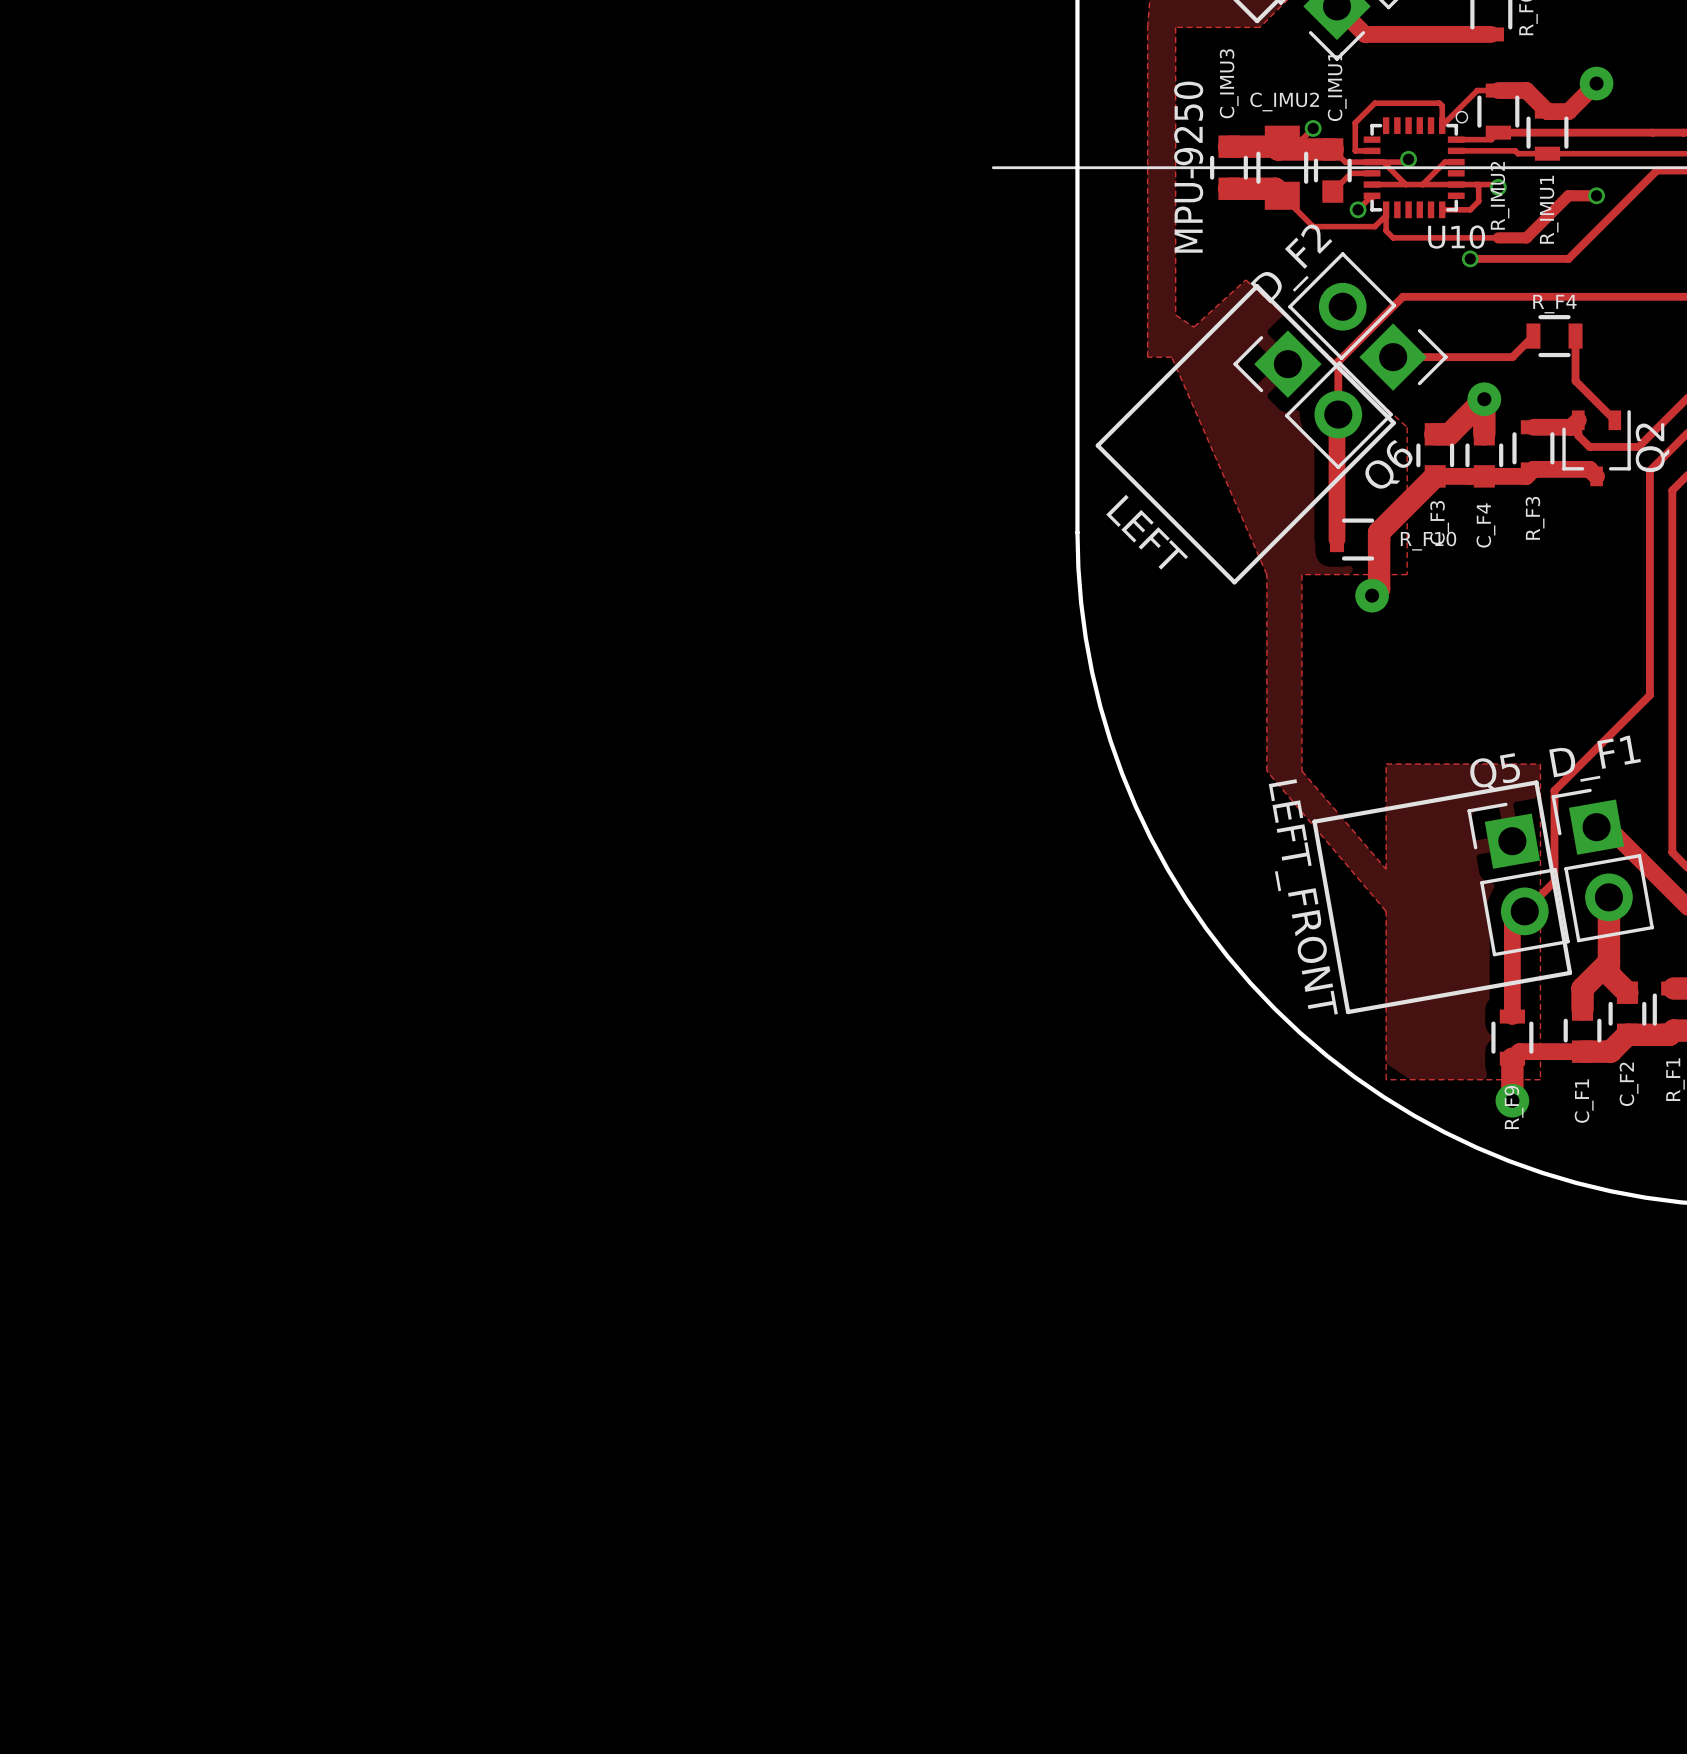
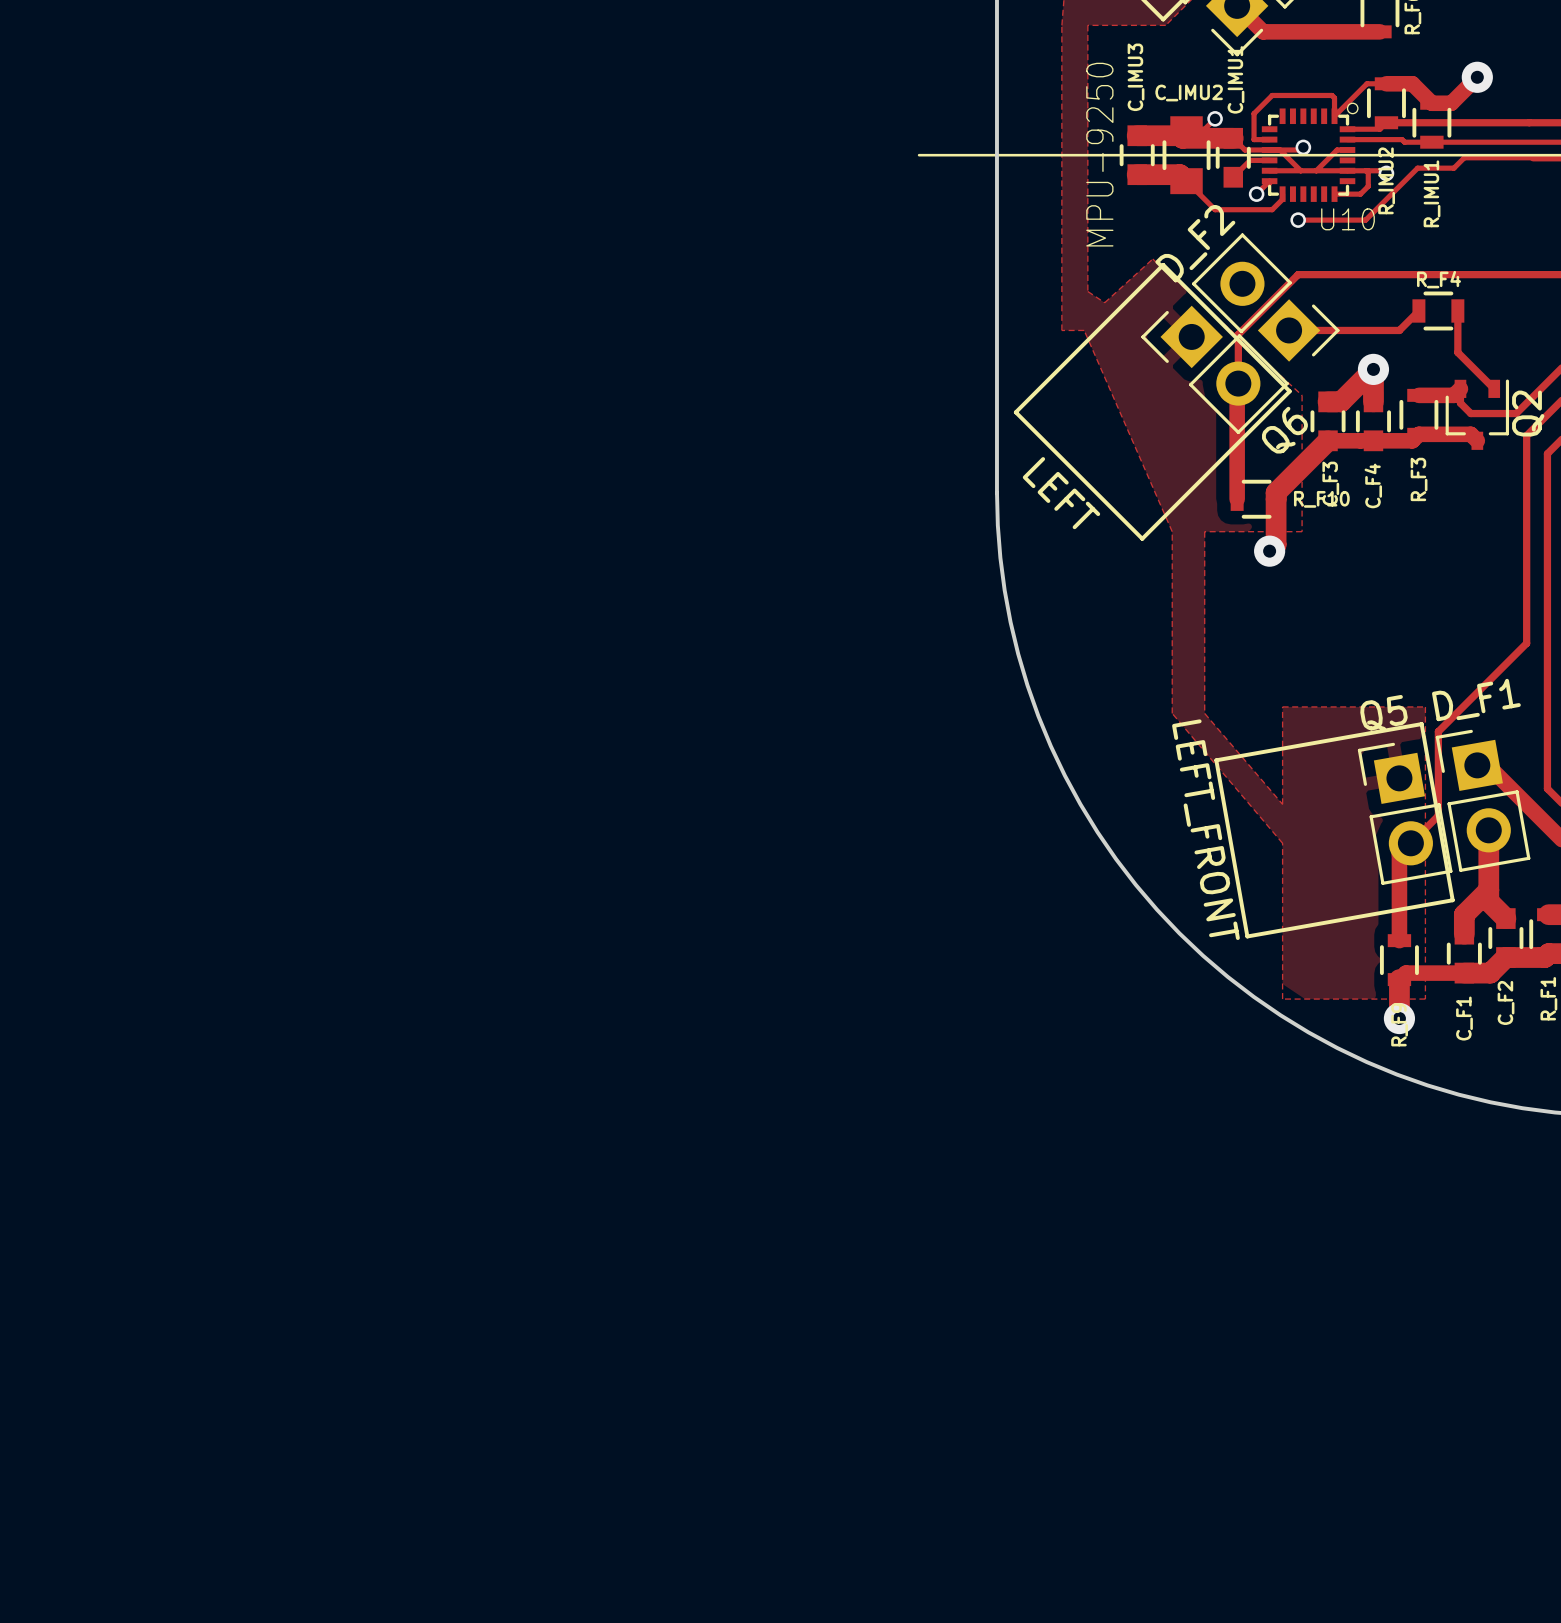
track: (1656, 170) (1568, 258) (1470, 258) -> (1533, 157) (1464, 157) (1453, 168) (1417, 168) (1365, 220)
track: (1596, 195) (1568, 195) (1526, 237) (1475, 237) -> none
via: (1596, 195) -> none
track: (1386, 215) (1386, 230) (1393, 237) (1402, 237) -> none
via position: (1470, 258) -> (1298, 220)

